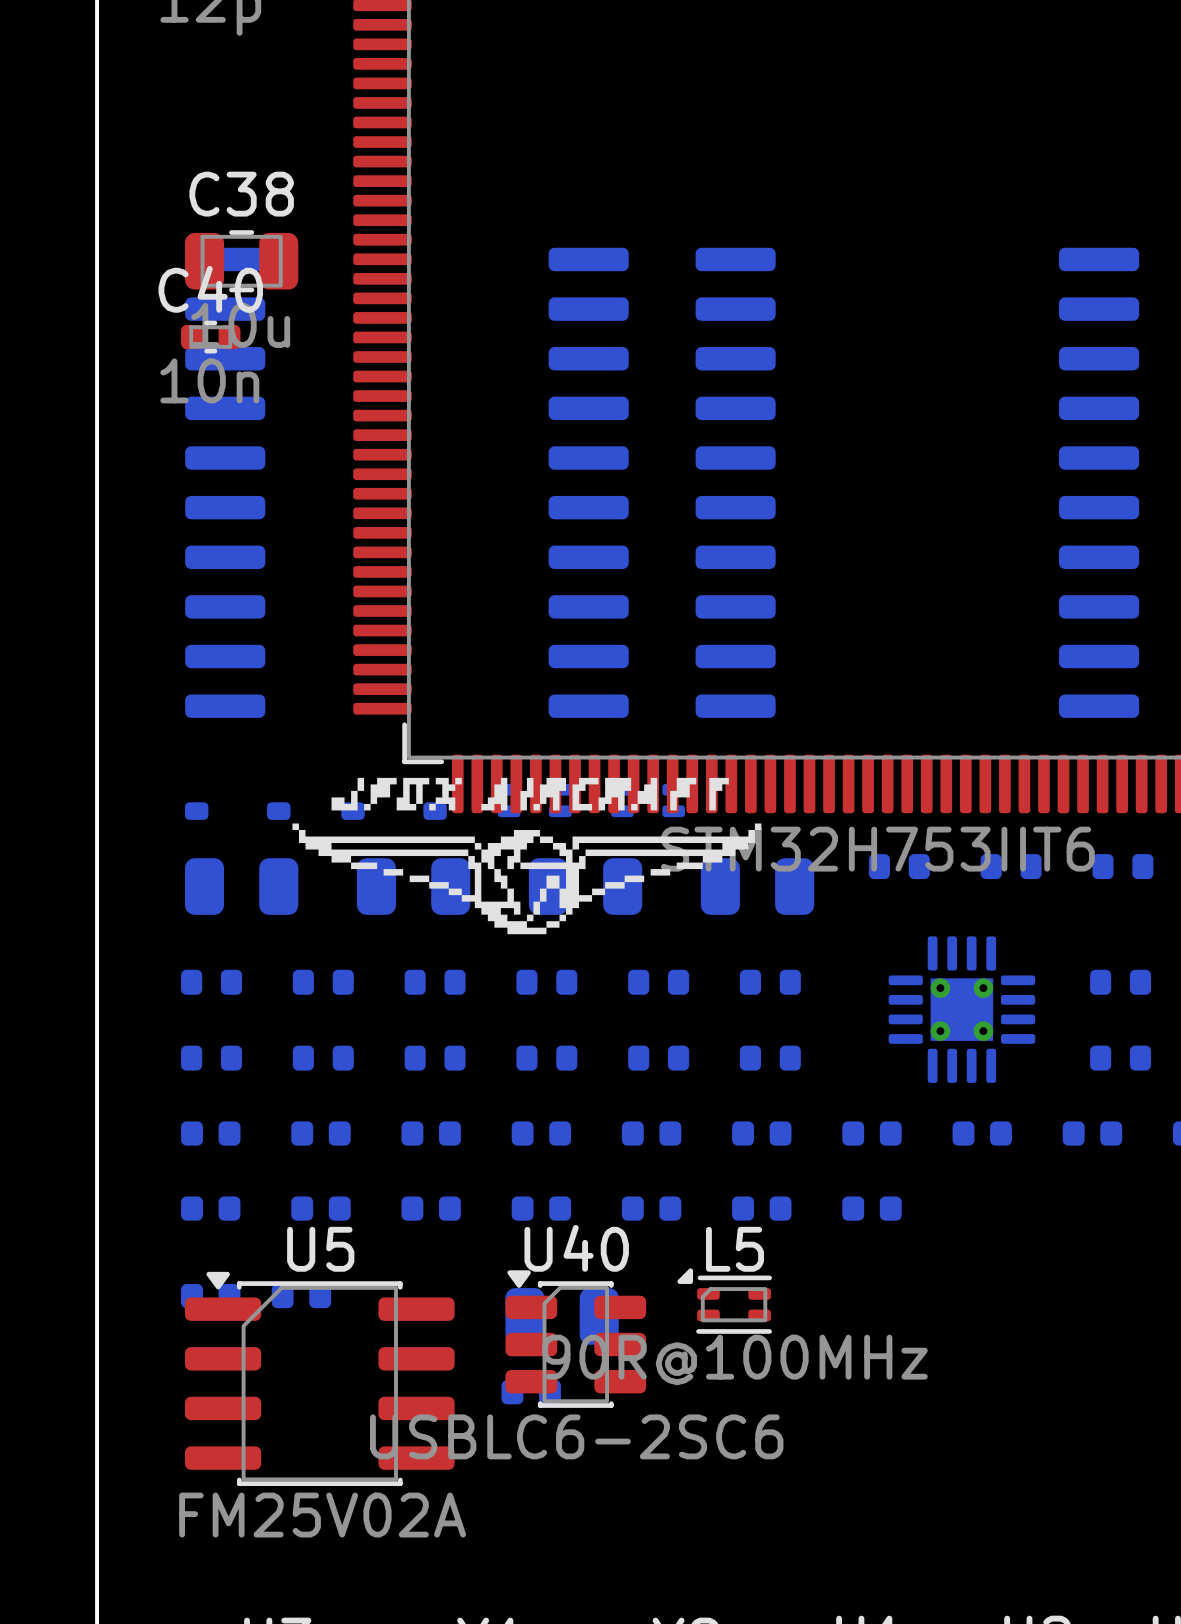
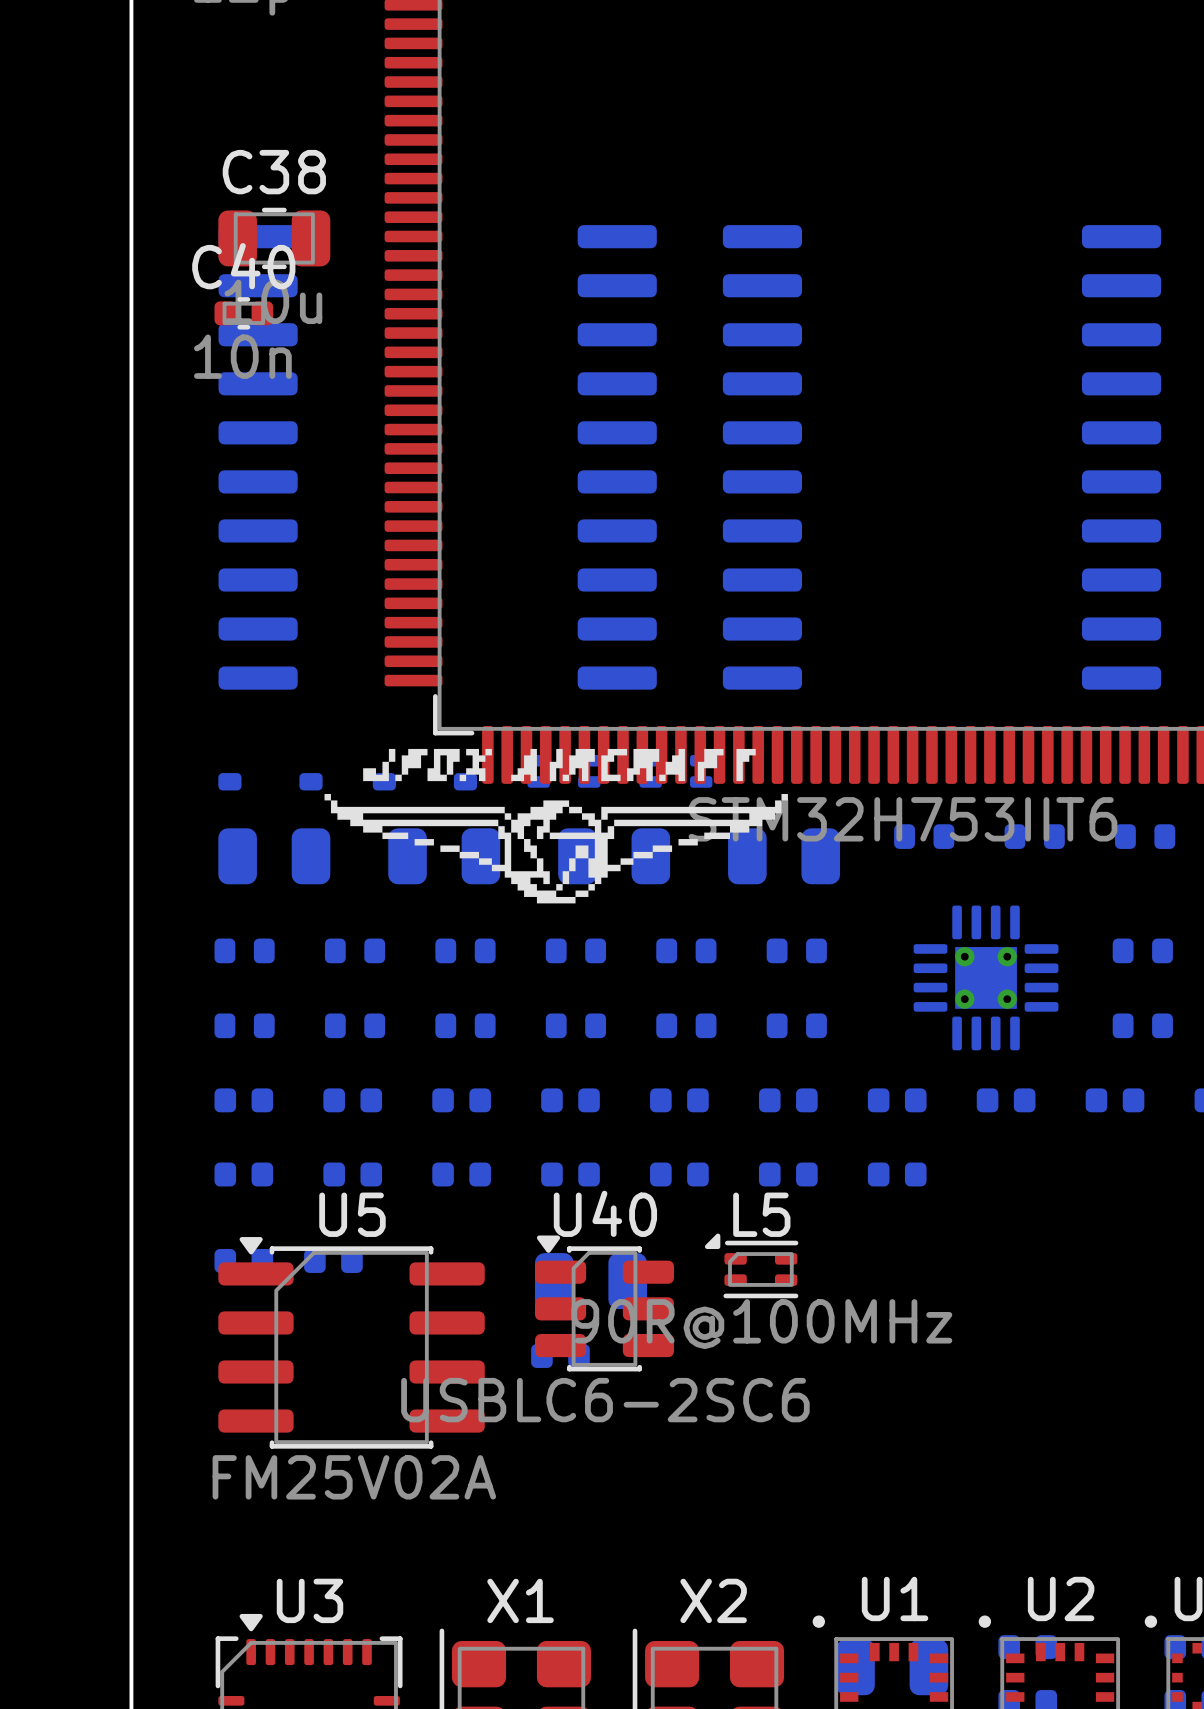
drawing shape: [292, 777, 762, 935] -> [324, 748, 788, 904]

